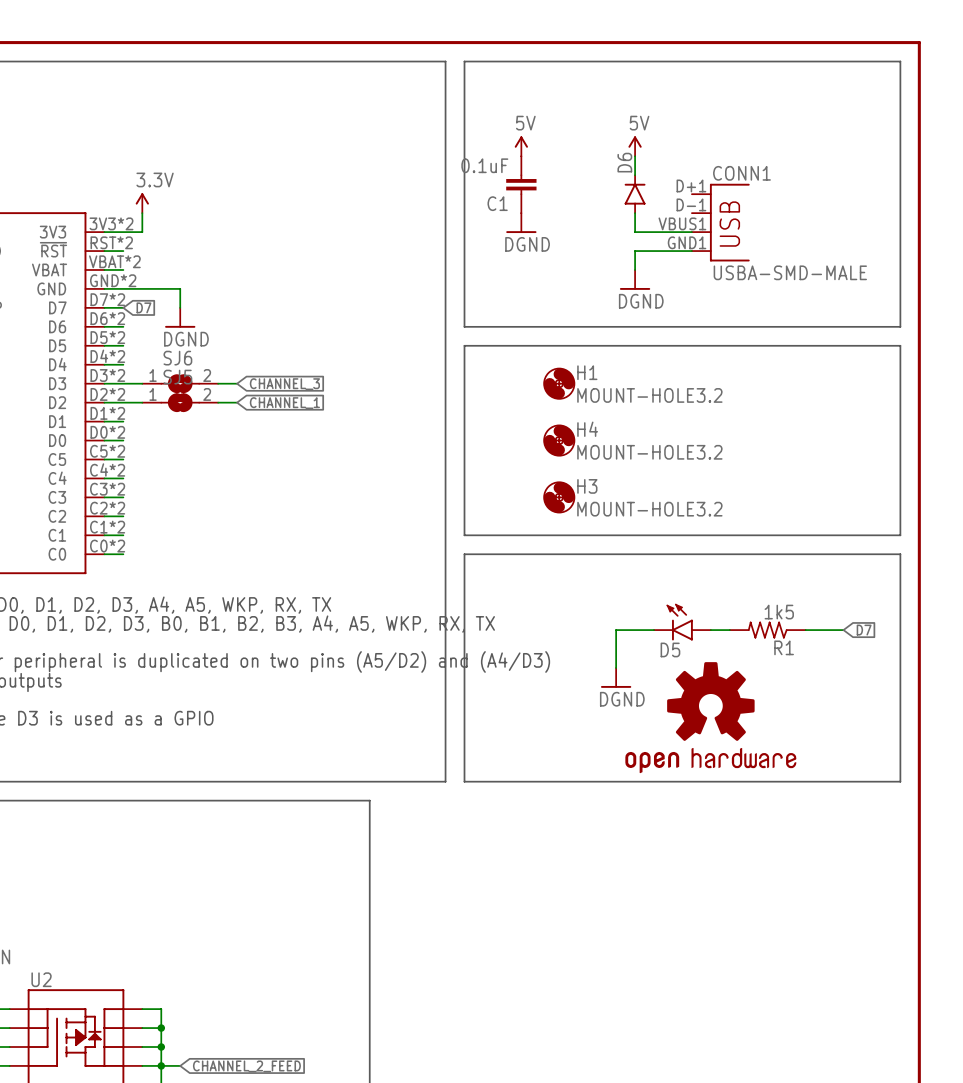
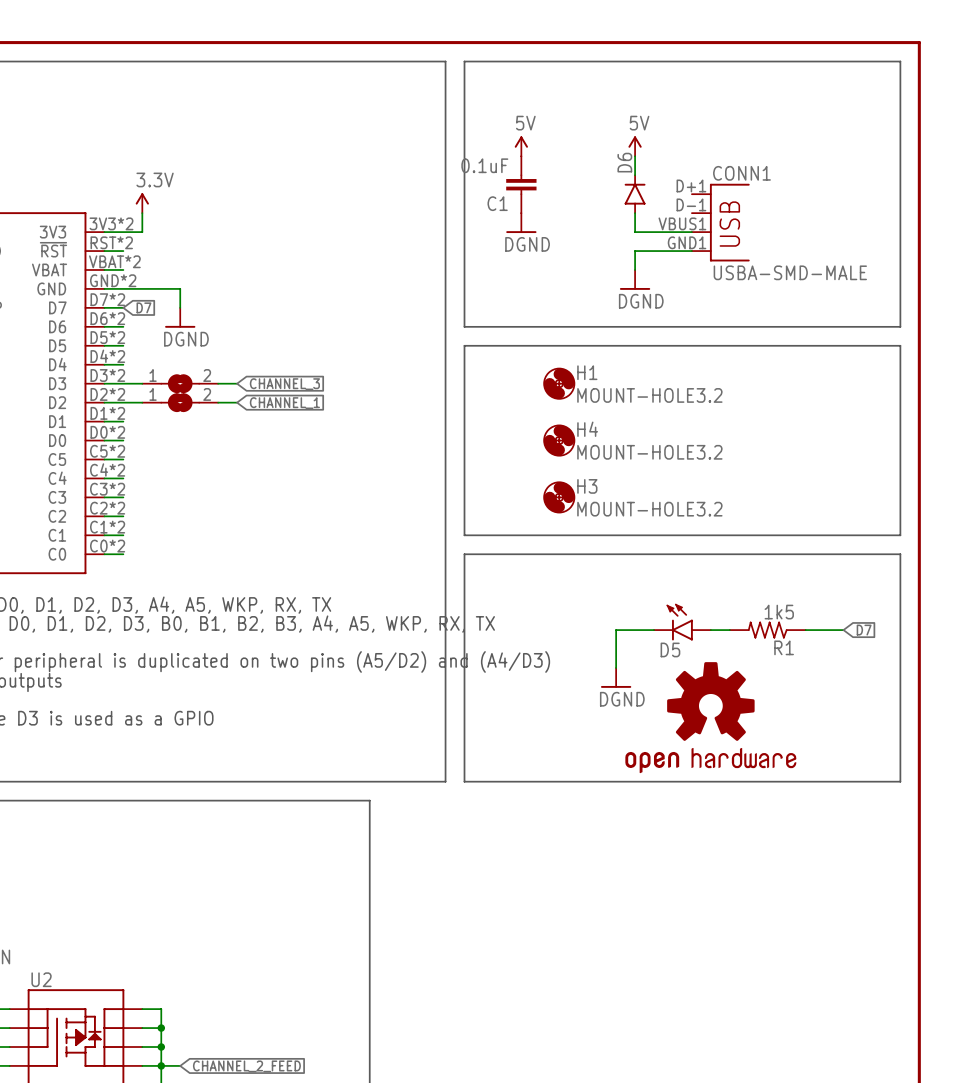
SJ6 name: SJ6 (177, 358) -> none
SJ5 name: SJ5 (177, 377) -> none

